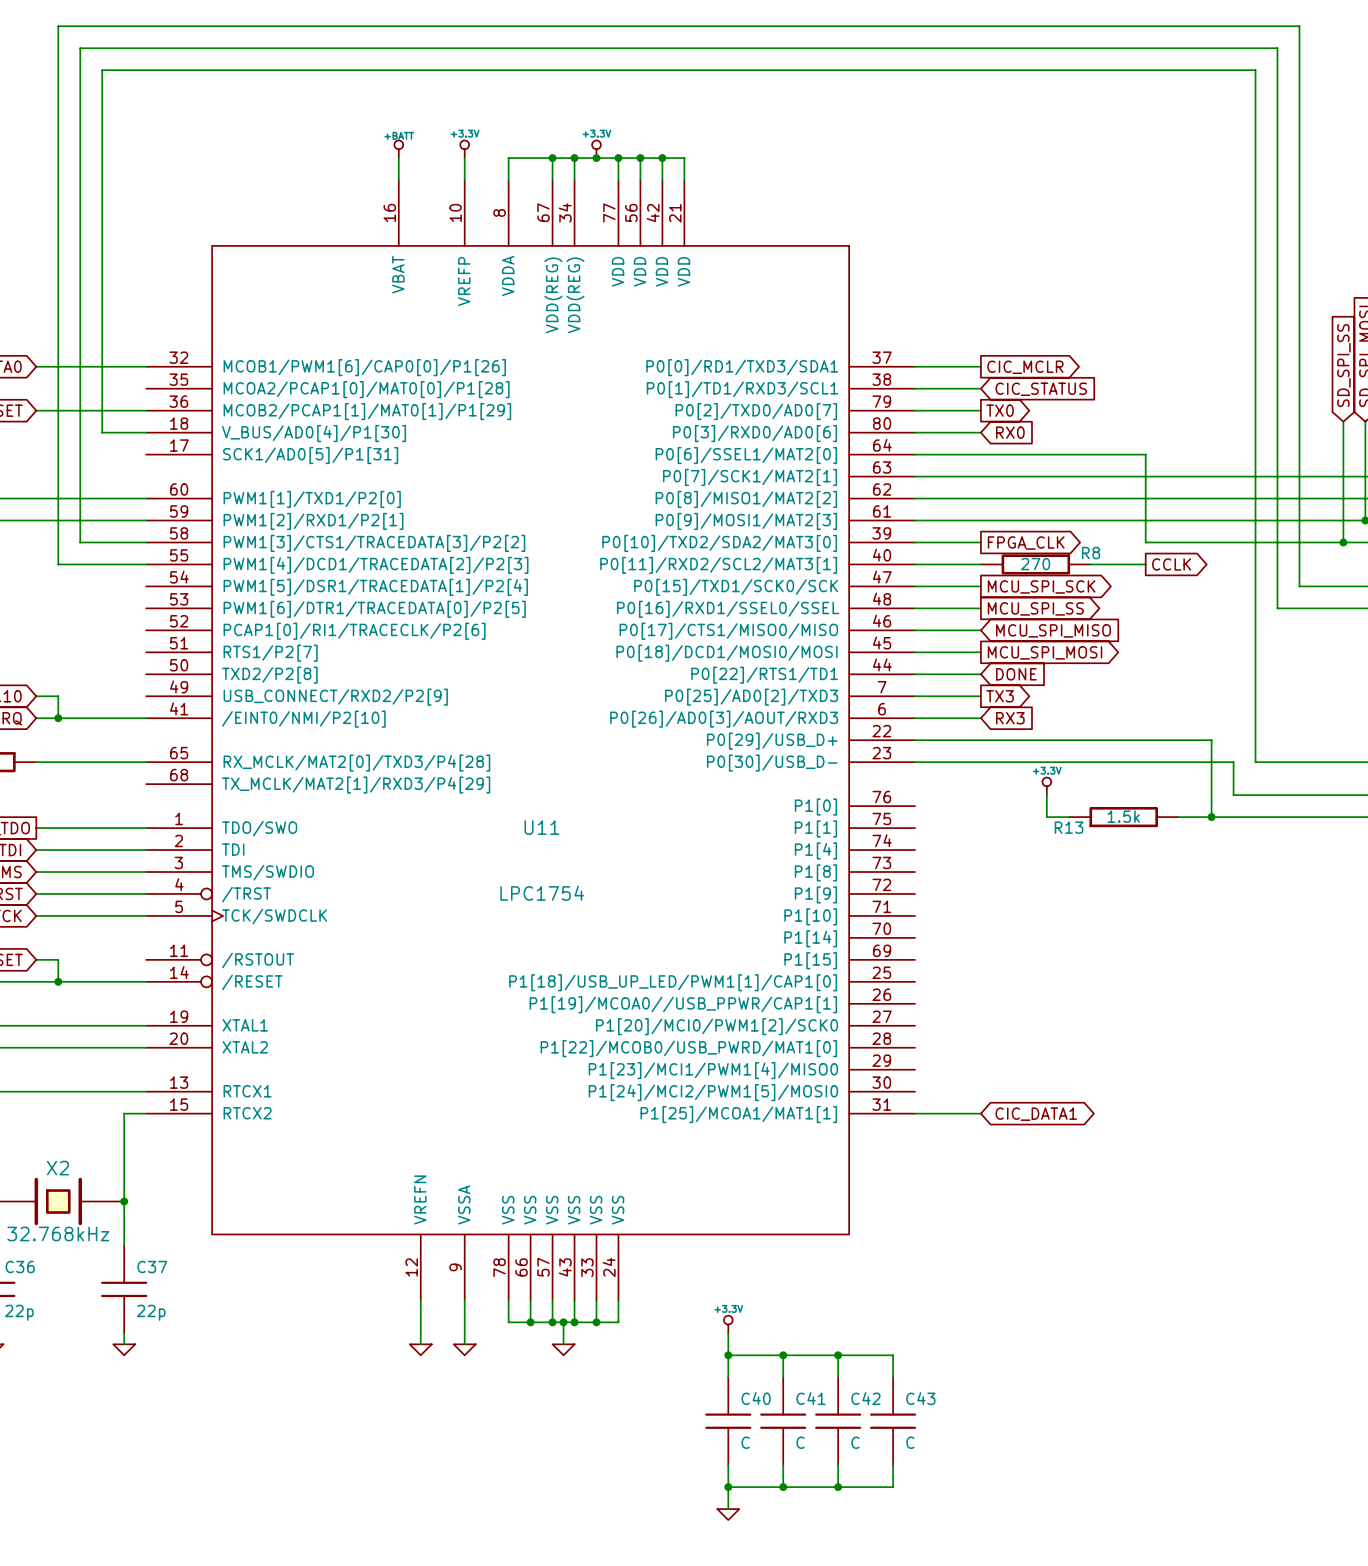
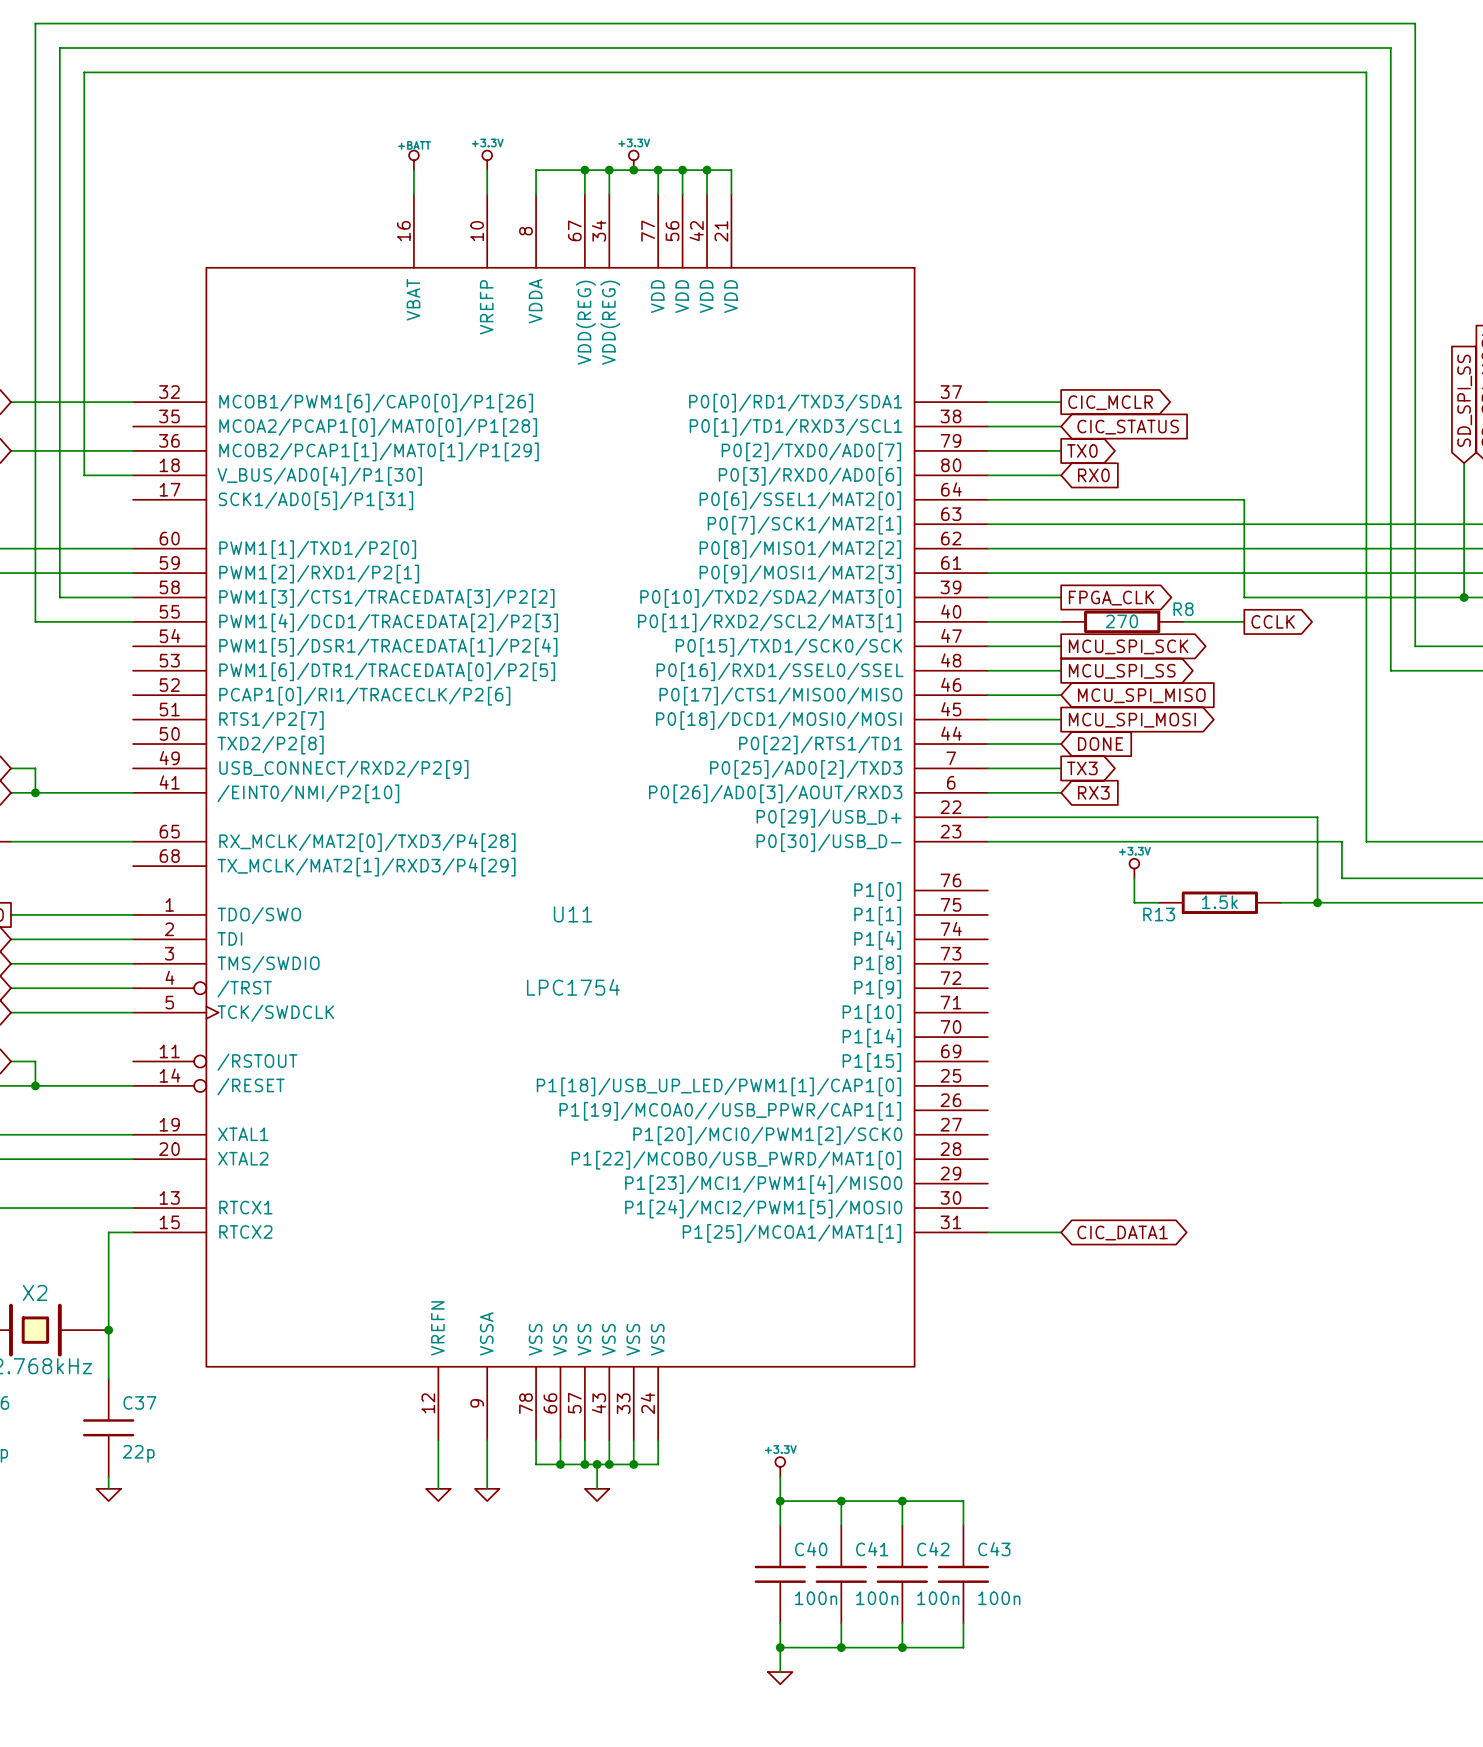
C40 value: C (745, 1442) -> 100n (816, 1598)
C41 value: C (800, 1442) -> 100n (877, 1598)
C42 value: C (855, 1442) -> 100n (938, 1598)
C43 value: C (910, 1442) -> 100n (999, 1598)

